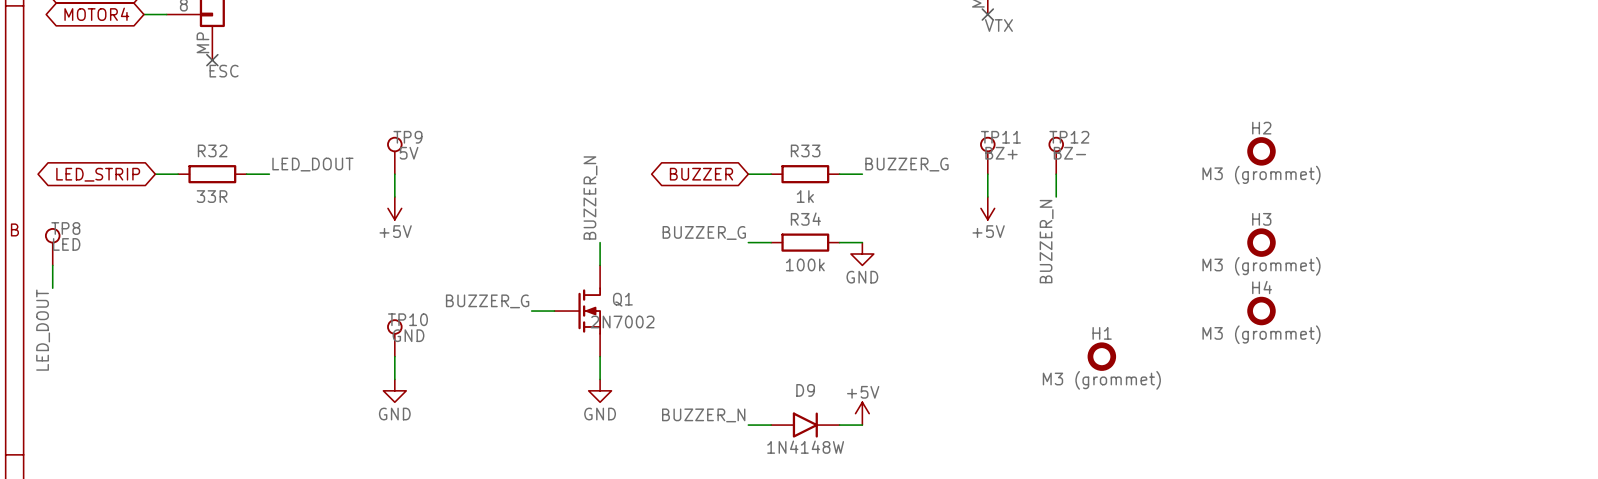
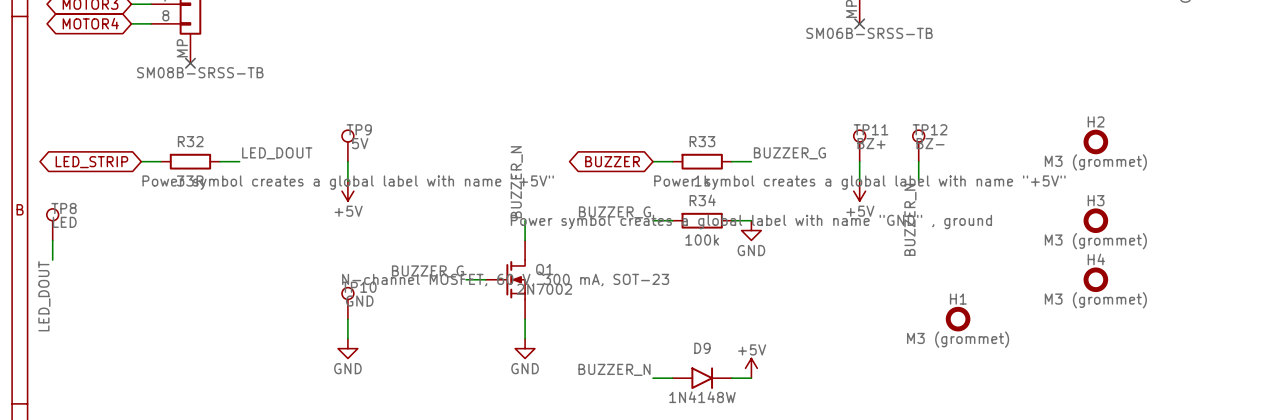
part value: VTX (998, 25) -> SM06B-SRSS-TB (869, 33)
part value: ESC (224, 71) -> SM08B-SRSS-TB (200, 72)
power symbol text: none -> Power symbol creates a global label with name "+5V" (348, 182)
power symbol text: none -> Power symbol creates a global label with name "+5V" (859, 182)
power symbol text: none -> Power symbol creates a global label with name "GND" , ground (751, 221)
Q1 text: none -> N-channel MOSFET, 60 V, 300 mA, SOT-23 (505, 280)

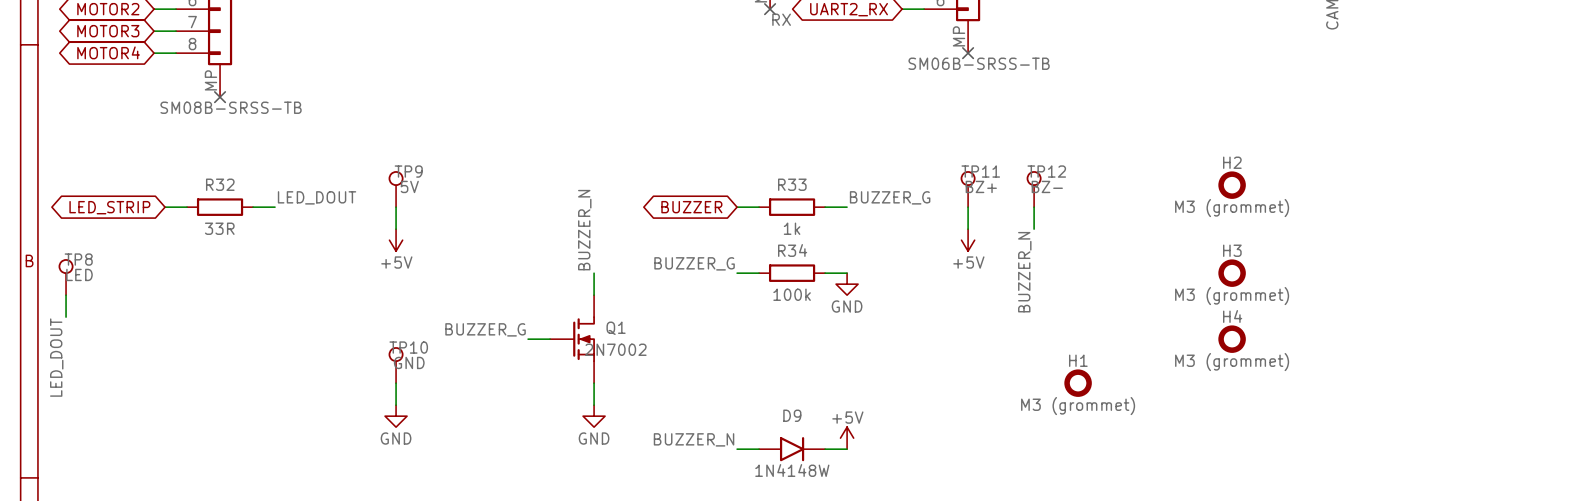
power symbol text: Power symbol creates a global label with name "+5V" (348, 182) -> none
power symbol text: Power symbol creates a global label with name "+5V" (859, 182) -> none
power symbol text: Power symbol creates a global label with name "GND" , ground (751, 221) -> none
Q1 text: N-channel MOSFET, 60 V, 300 mA, SOT-23 (505, 280) -> none

